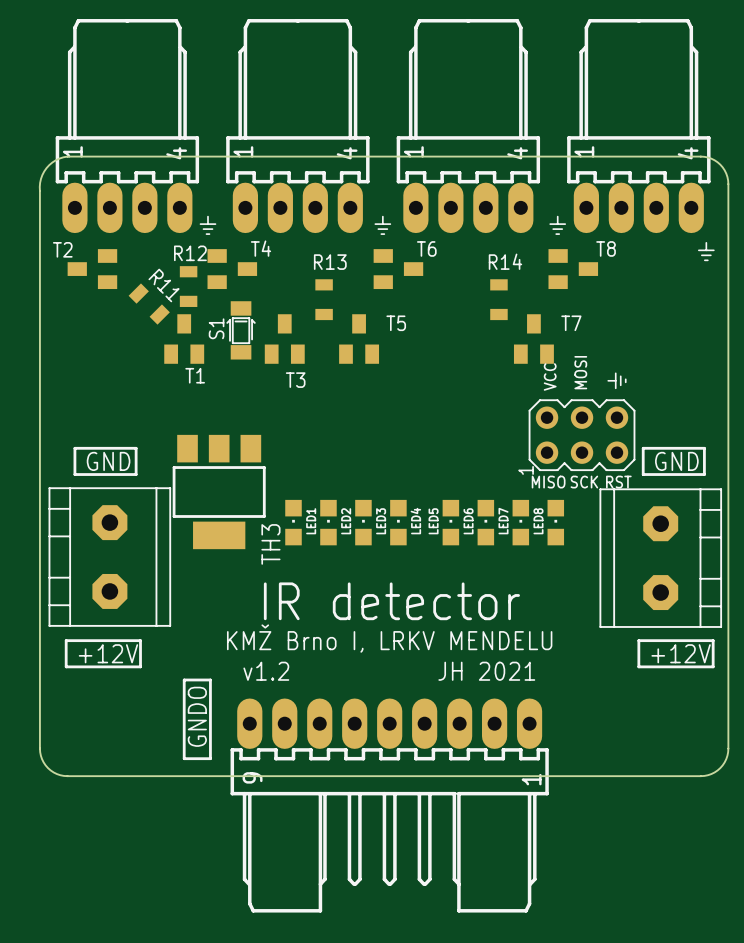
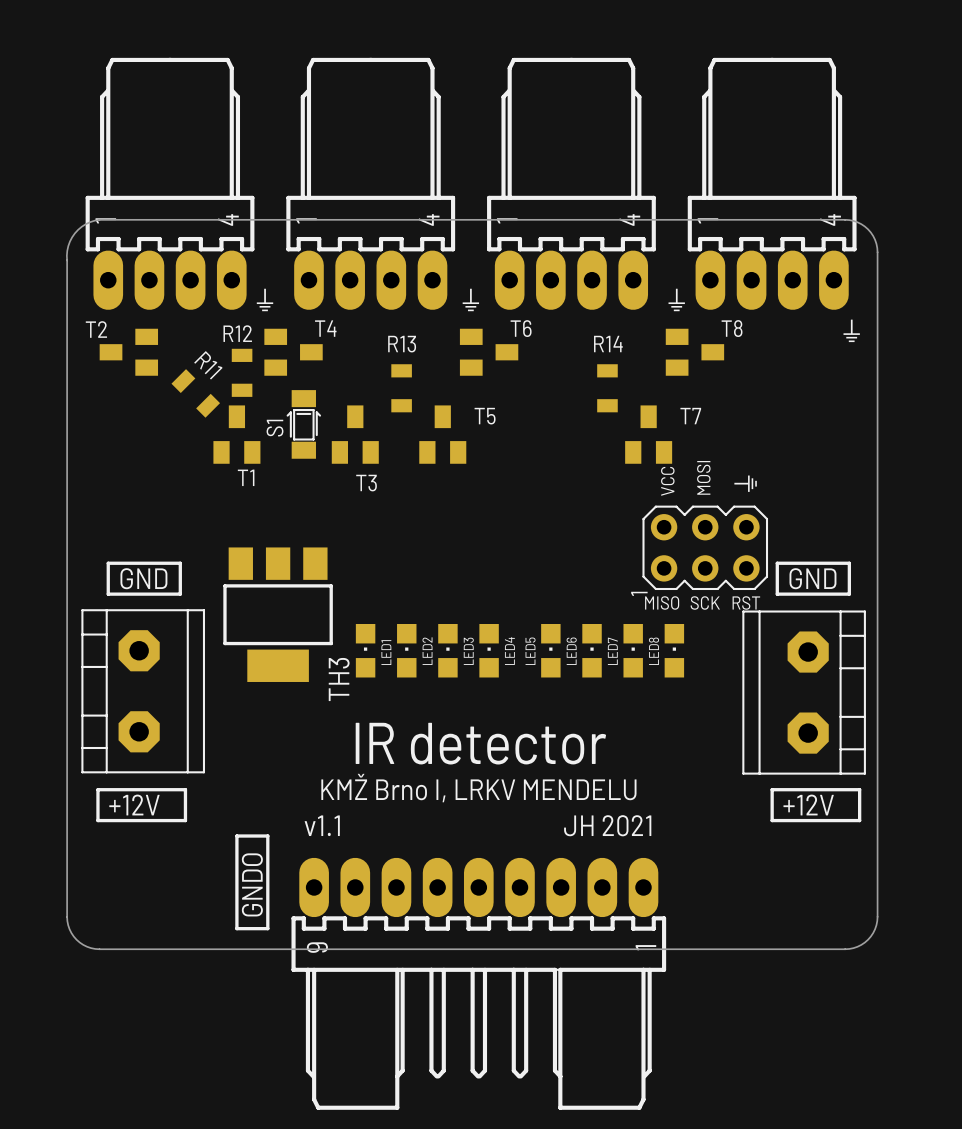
part footprint: [48, 487, 172, 627] -> [81, 609, 206, 774]
part footprint: [599, 488, 723, 628] -> [742, 610, 866, 775]
text: v1.2 (266, 671) -> v1.1 (322, 825)

